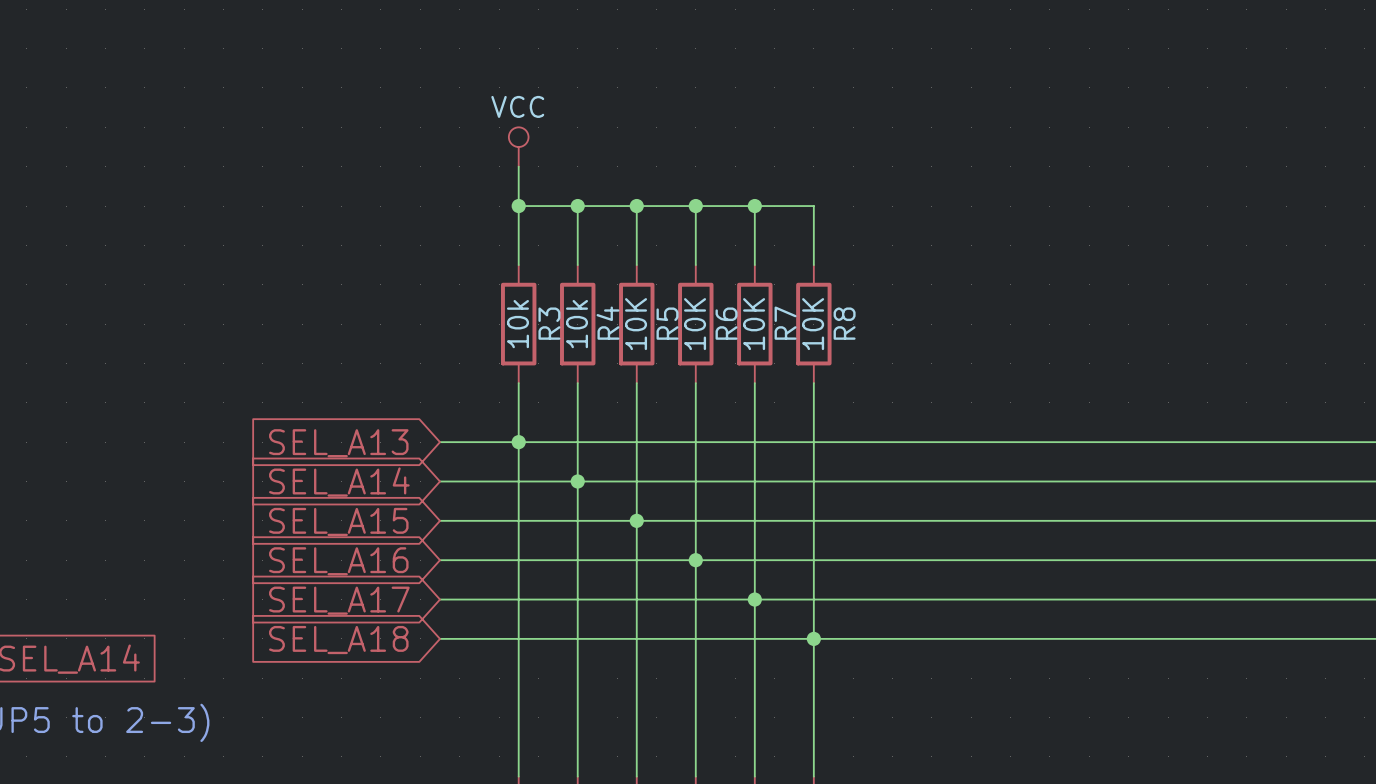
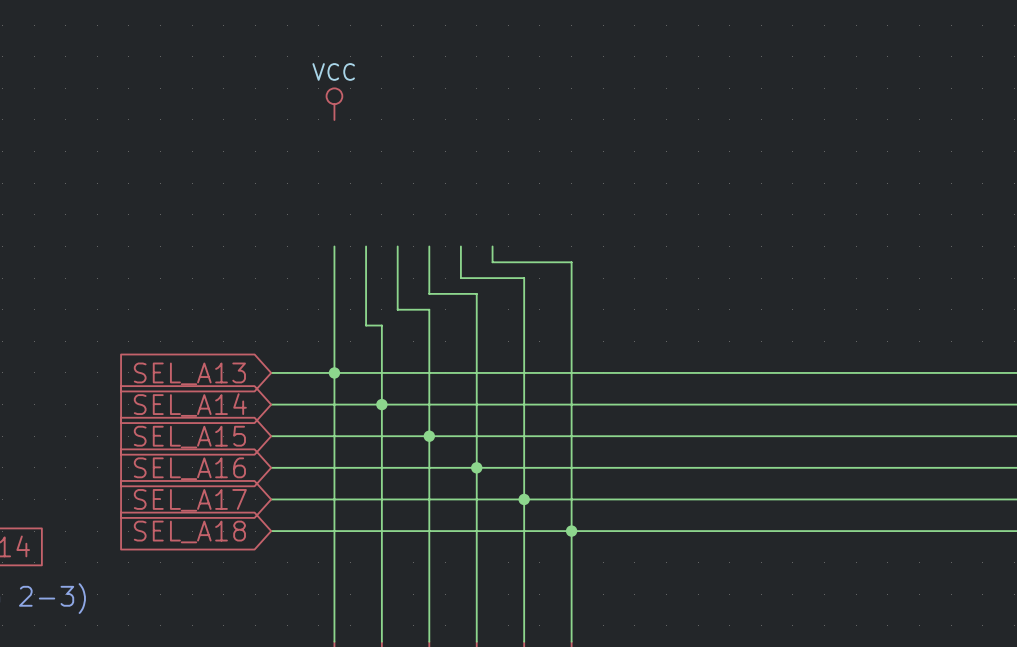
power symbol position: VCC (518, 147) -> VCC (334, 104)
wire: (518, 166) (518, 265) -> (334, 246) (334, 325)
wire: (518, 206) (813, 206) (813, 265) -> none
junction: (518, 206) -> none
wire: (577, 206) (577, 265) -> none
junction: (577, 206) -> none
wire: (636, 206) (636, 265) -> none
junction: (636, 206) -> none
wire: (695, 206) (695, 265) -> none
junction: (695, 206) -> none
wire: (754, 206) (754, 265) -> none
junction: (754, 206) -> none
wire: none -> (366, 246) (366, 325) (381, 325)
wire: none -> (397, 246) (397, 309) (429, 309) (429, 325)
wire: none -> (429, 246) (429, 293) (476, 293) (476, 325)
wire: none -> (460, 246) (460, 278) (524, 278) (524, 325)
wire: none -> (492, 246) (492, 262) (571, 262) (571, 325)
R3: 10k (518, 324) -> none
R4: 10k (577, 324) -> none
R5: 10K (636, 324) -> none
R6: 10K (695, 324) -> none
R7: 10K (754, 324) -> none
R8: 10K (813, 324) -> none

